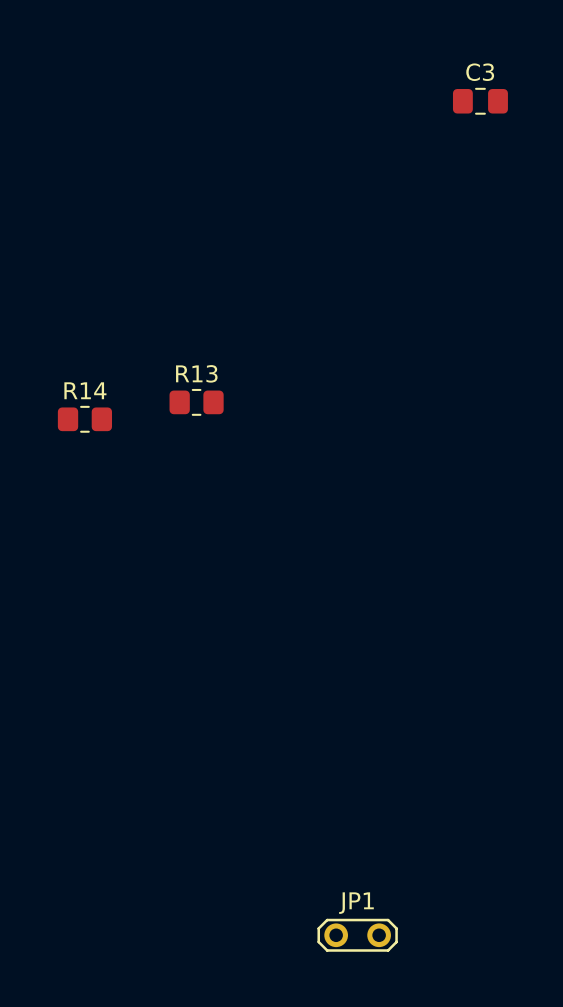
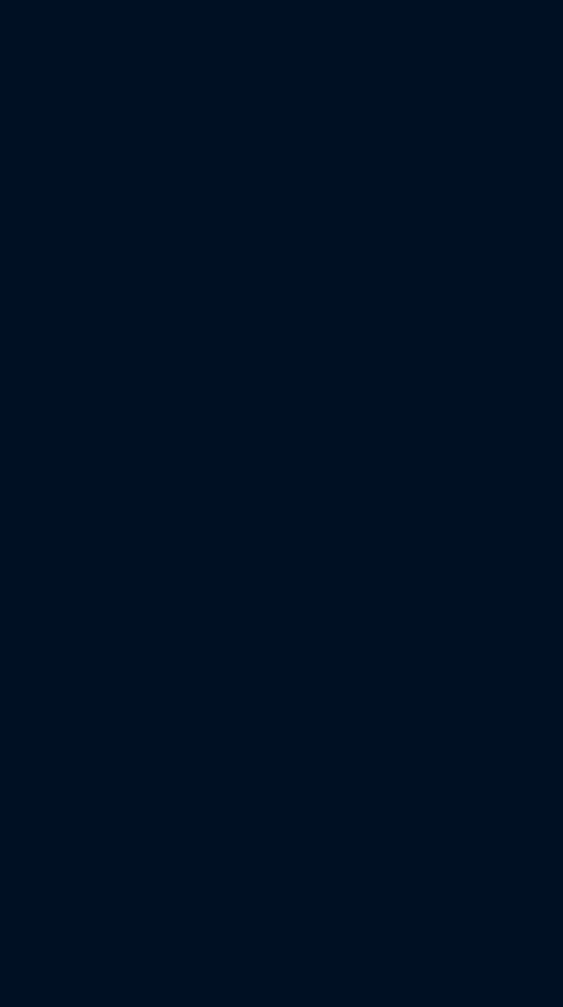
C3: (480, 101) -> none
R13: (196, 402) -> none
R14: (84, 419) -> none
JP1: (357, 935) -> none

